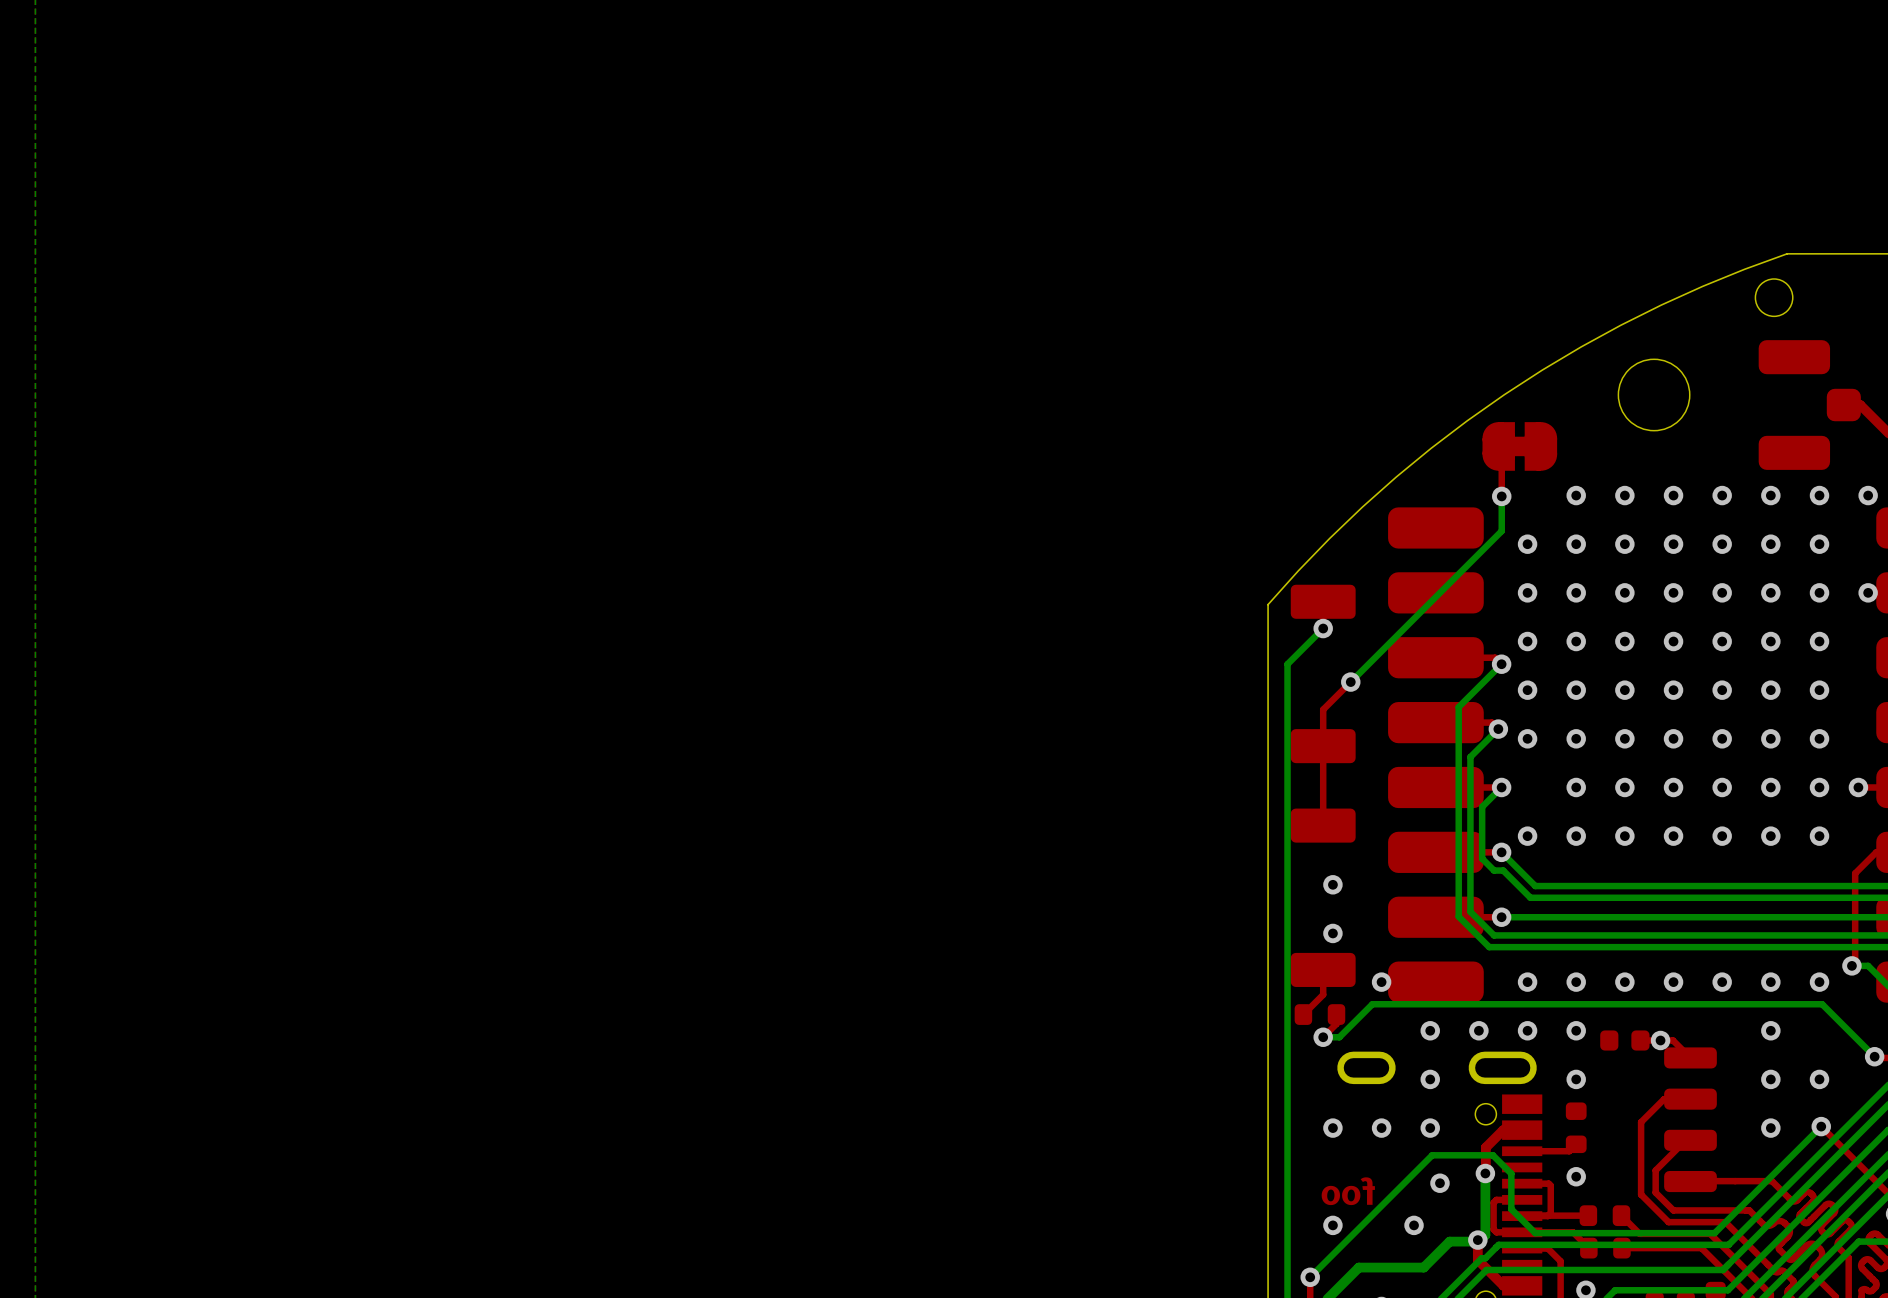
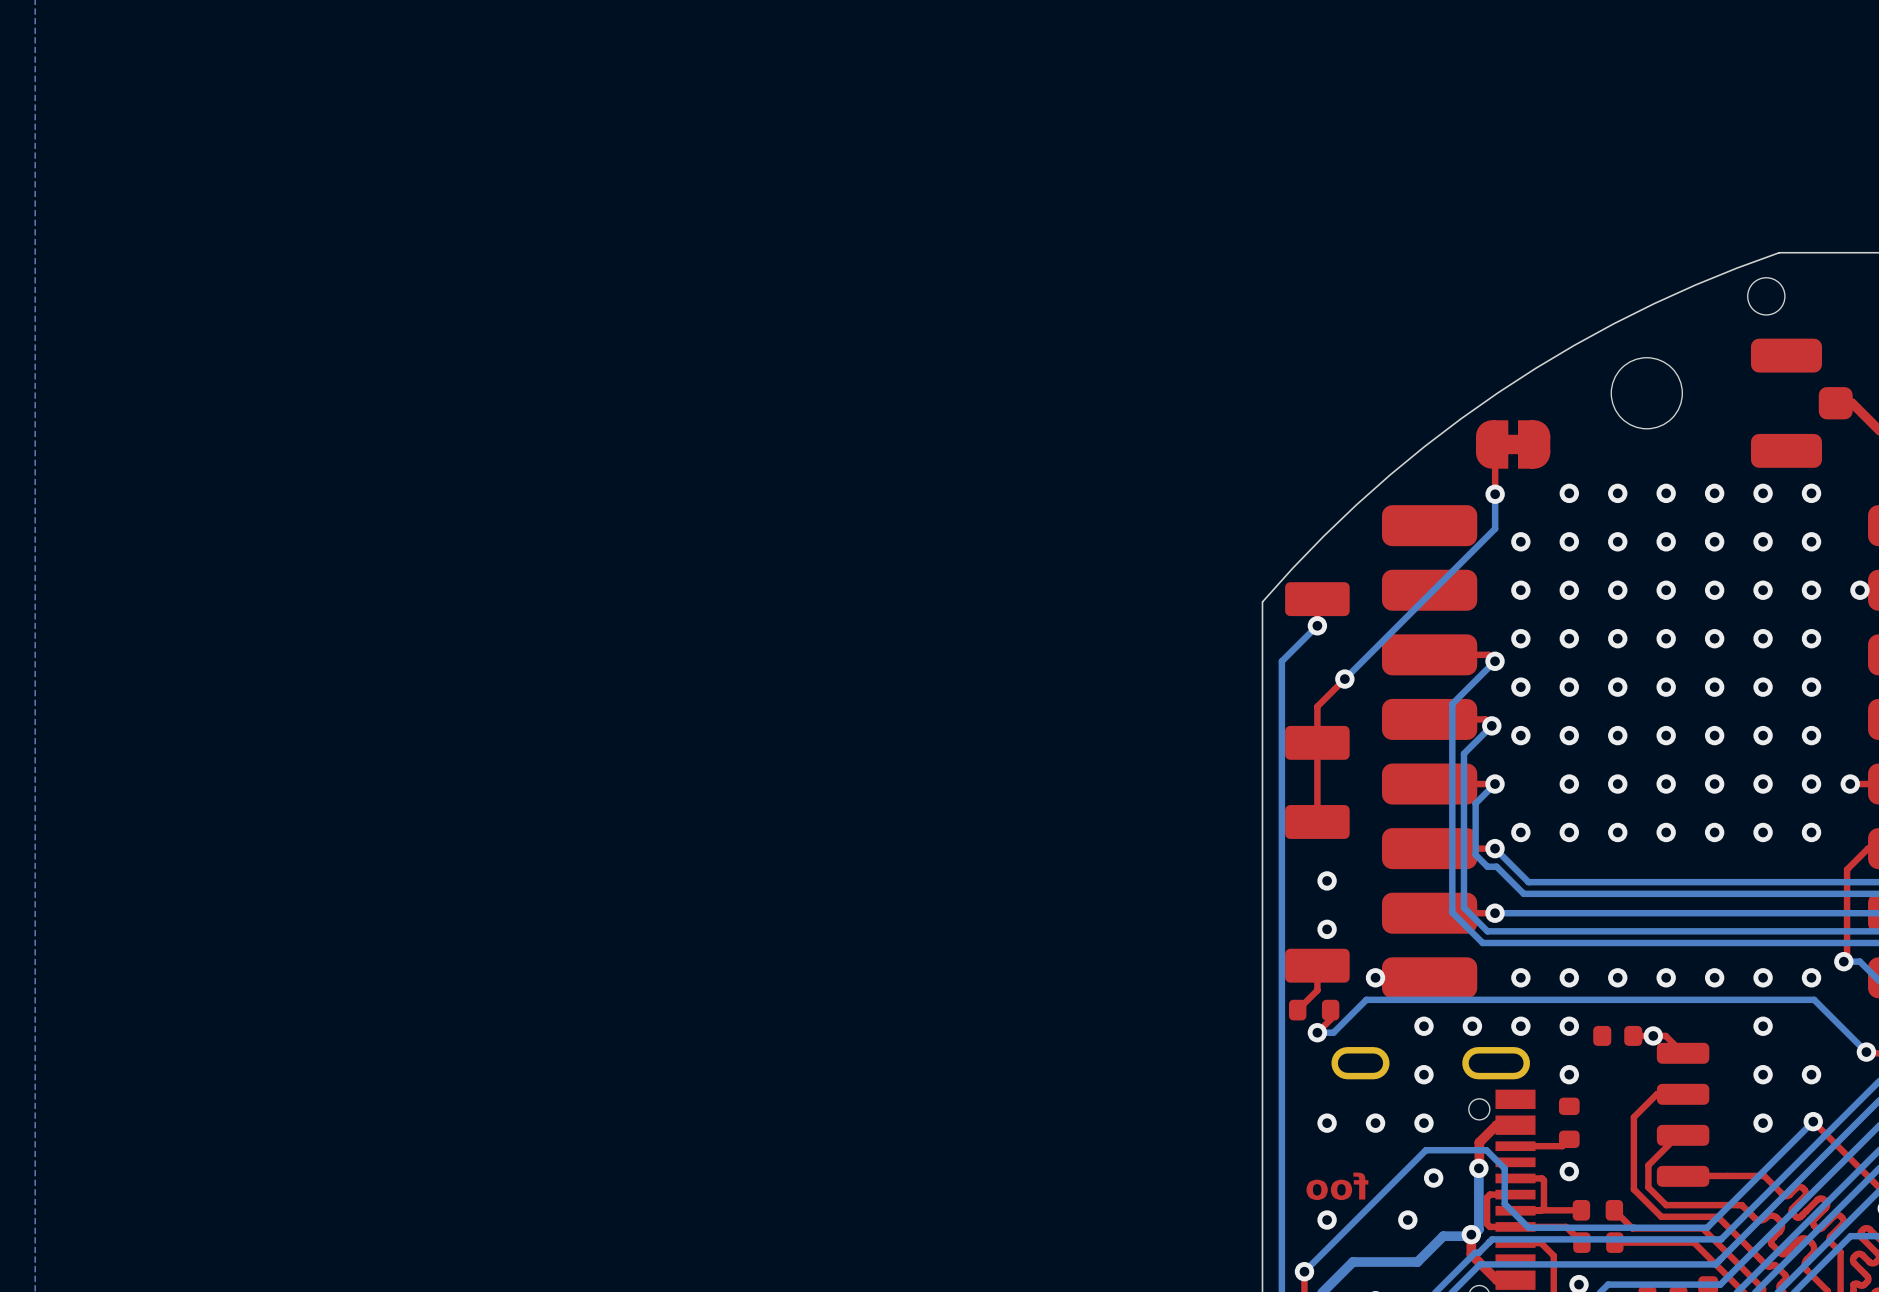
via: (1868, 495) -> none

